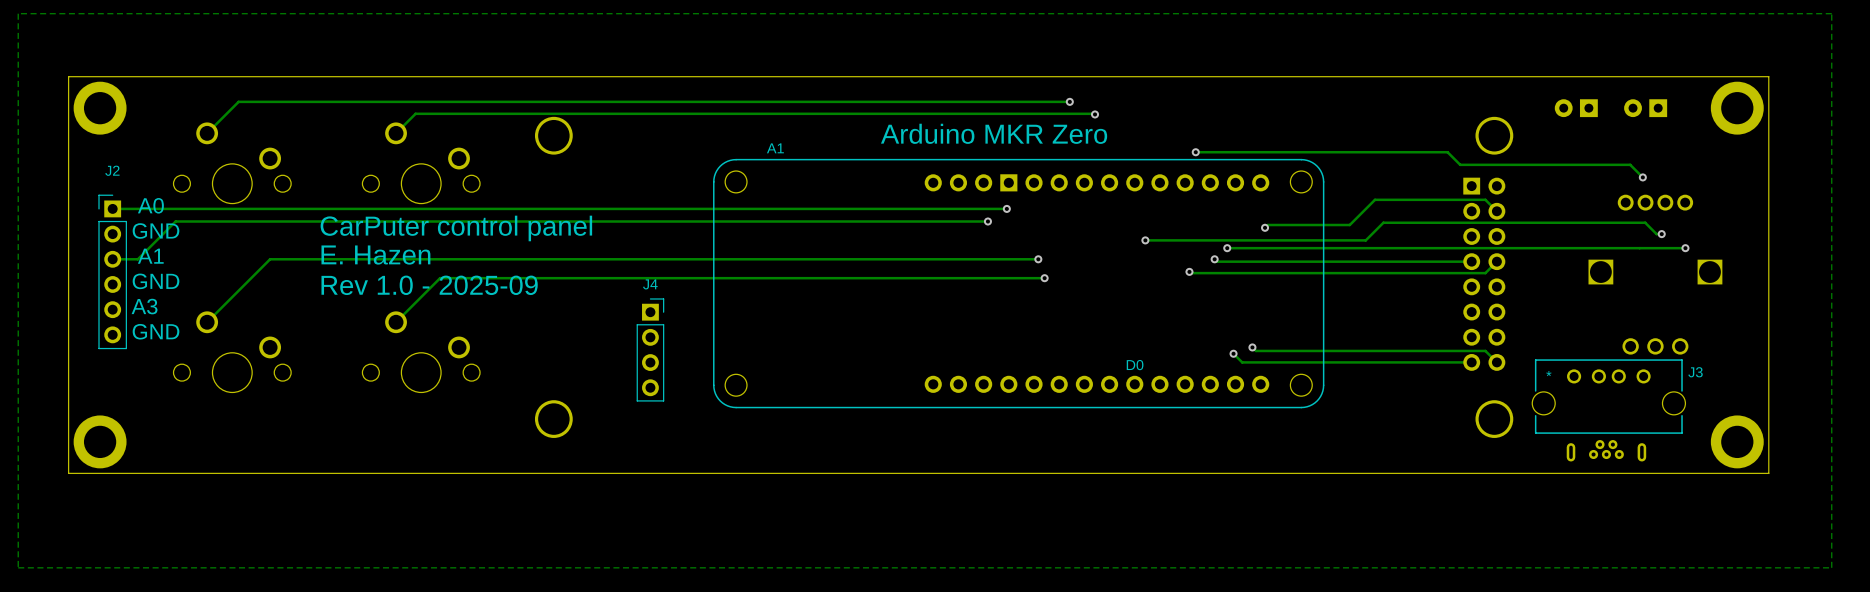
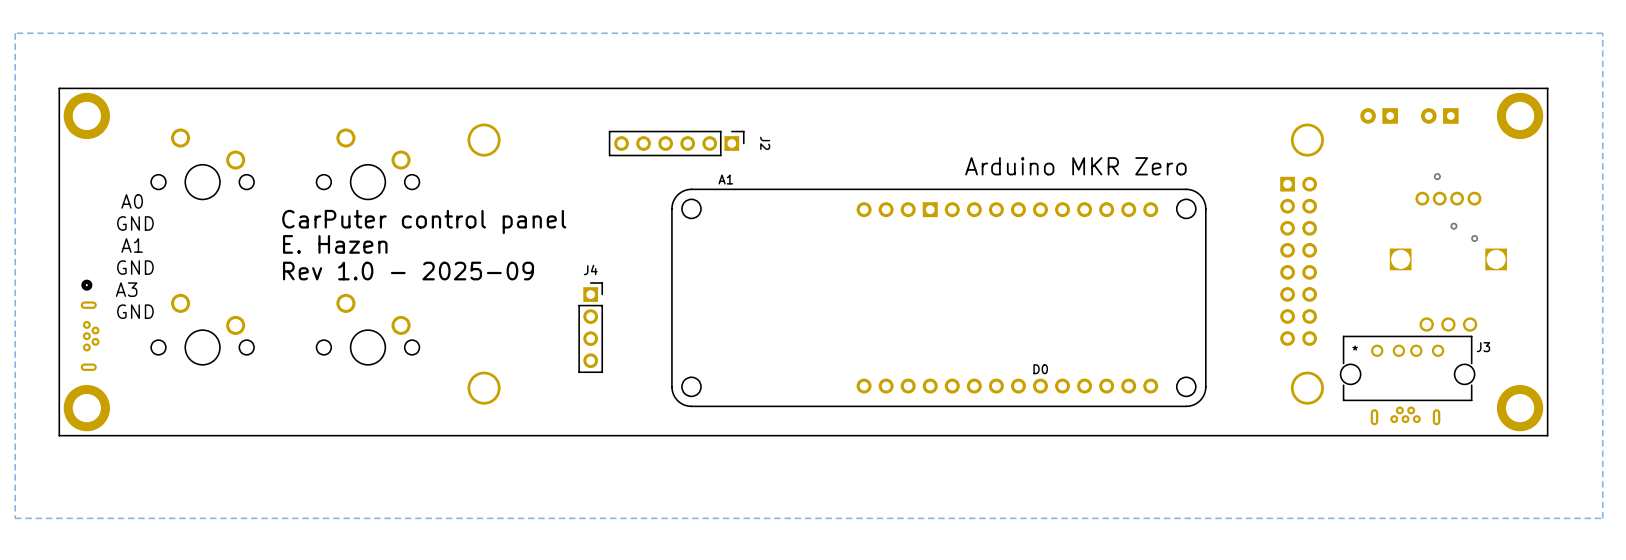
track: (1069, 101) (238, 101) (207, 133) -> none
via: (1069, 101) -> none
track: (1095, 114) (415, 113) (396, 133) -> none
via: (1095, 114) -> none
text position: Arduino MKR Zero (994, 133) -> Arduino MKR Zero (1075, 166)
track: (1195, 152) (1447, 152) (1460, 164) (1630, 164) (1642, 177) -> none
via: (1195, 152) -> none
track: (1006, 208) (112, 208) -> none
via: (1006, 208) -> none
track: (1496, 211) (1485, 199) (1374, 199) (1349, 225) (1267, 225) (1265, 227) -> none
track: (987, 221) (175, 221) (137, 259) (112, 259) -> none
via: (987, 221) -> none
via: (1265, 227) -> none
track: (1661, 234) (1656, 234) (1645, 222) (1383, 222) (1365, 240) (1145, 240) -> none
via: (1145, 240) -> none
track: (1686, 246) (1227, 248) -> none
via: (1227, 248) -> none
track: (1038, 259) (270, 259) (207, 322) -> none
via: (1038, 259) -> none
track: (1214, 259) (1217, 261) (1471, 261) -> none
via: (1214, 259) -> none
track: (1496, 261) (1485, 273) (1189, 271) -> none
J2 rotation: 0° (112, 271) -> 90° clockwise (676, 143)
J2 position: (112, 271) -> (676, 143)
via: (1189, 271) -> none
track: (1044, 278) (440, 278) (396, 322) -> none
via: (1044, 278) -> none
A1 position: (1018, 283) -> (938, 297)
part: none -> (90, 325)
track: (1252, 347) (1255, 350) (1485, 350) (1496, 362) -> none
via: (1252, 347) -> none
J4 position: (650, 349) -> (590, 327)
track: (1233, 353) (1242, 362) (1471, 362) -> none
via: (1233, 353) -> none

